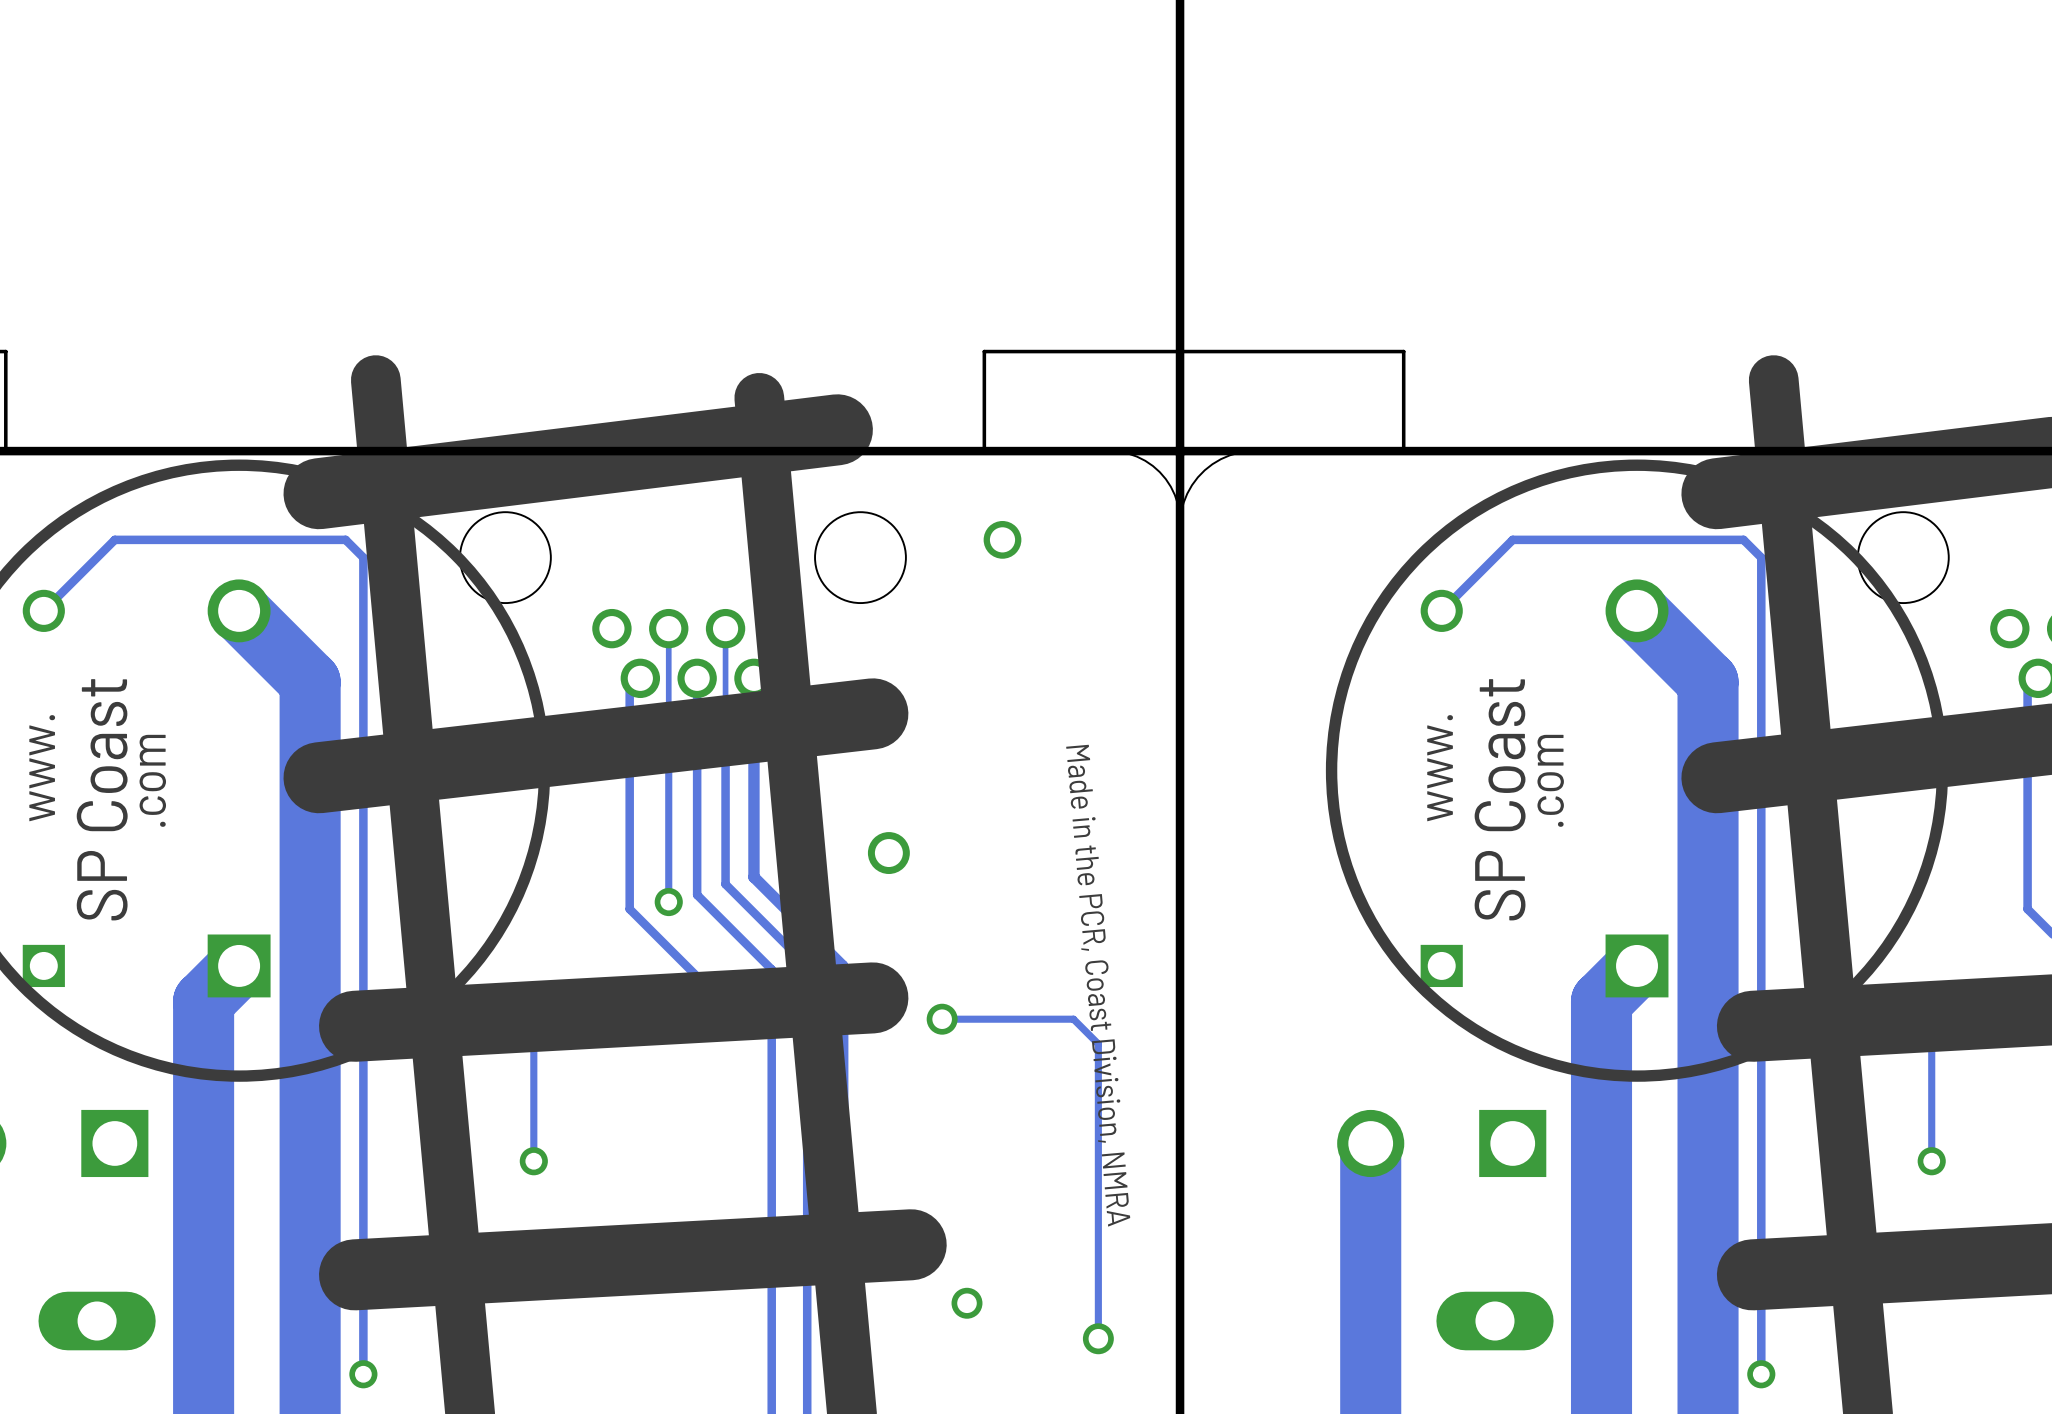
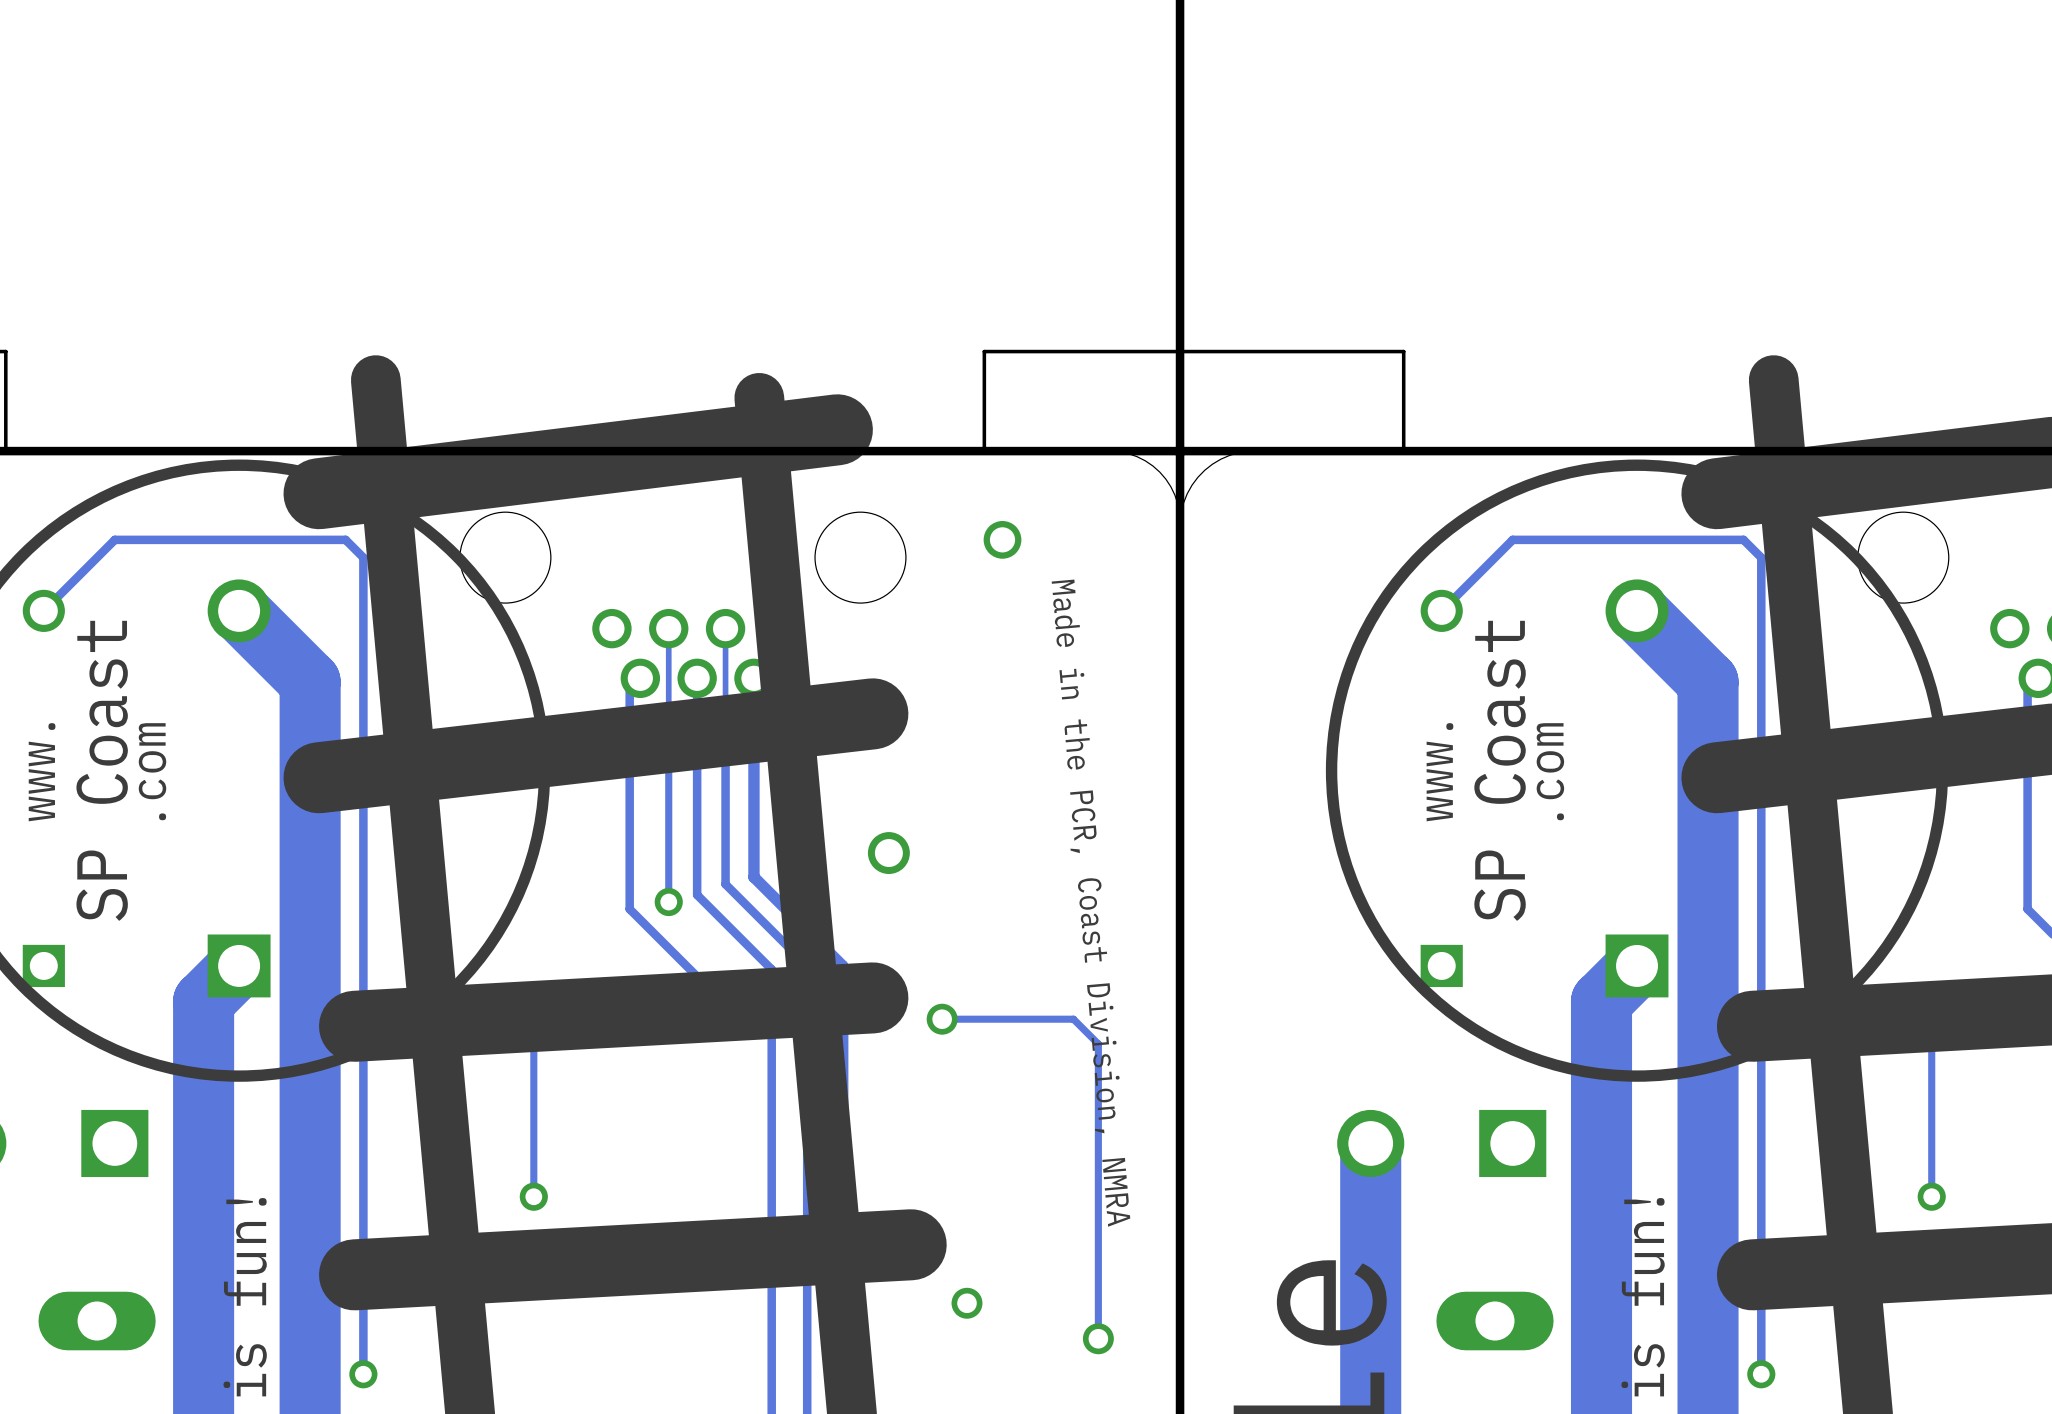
track: none -> (533, 1161) (533, 1196)
via position: (533, 1161) -> (533, 1196)
track: none -> (1931, 1161) (1931, 1196)
via position: (1931, 1161) -> (1931, 1196)

